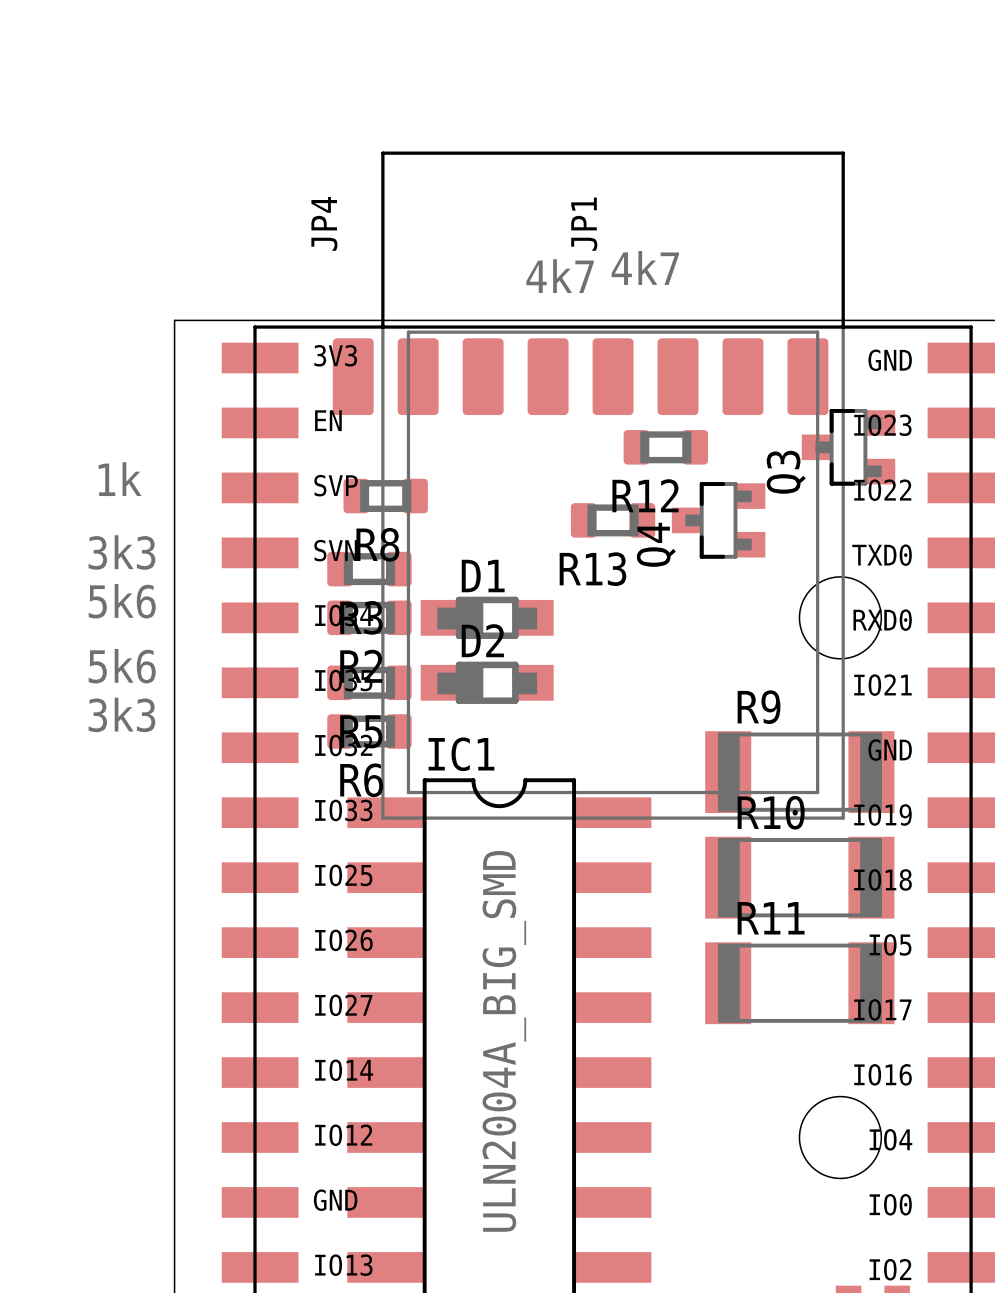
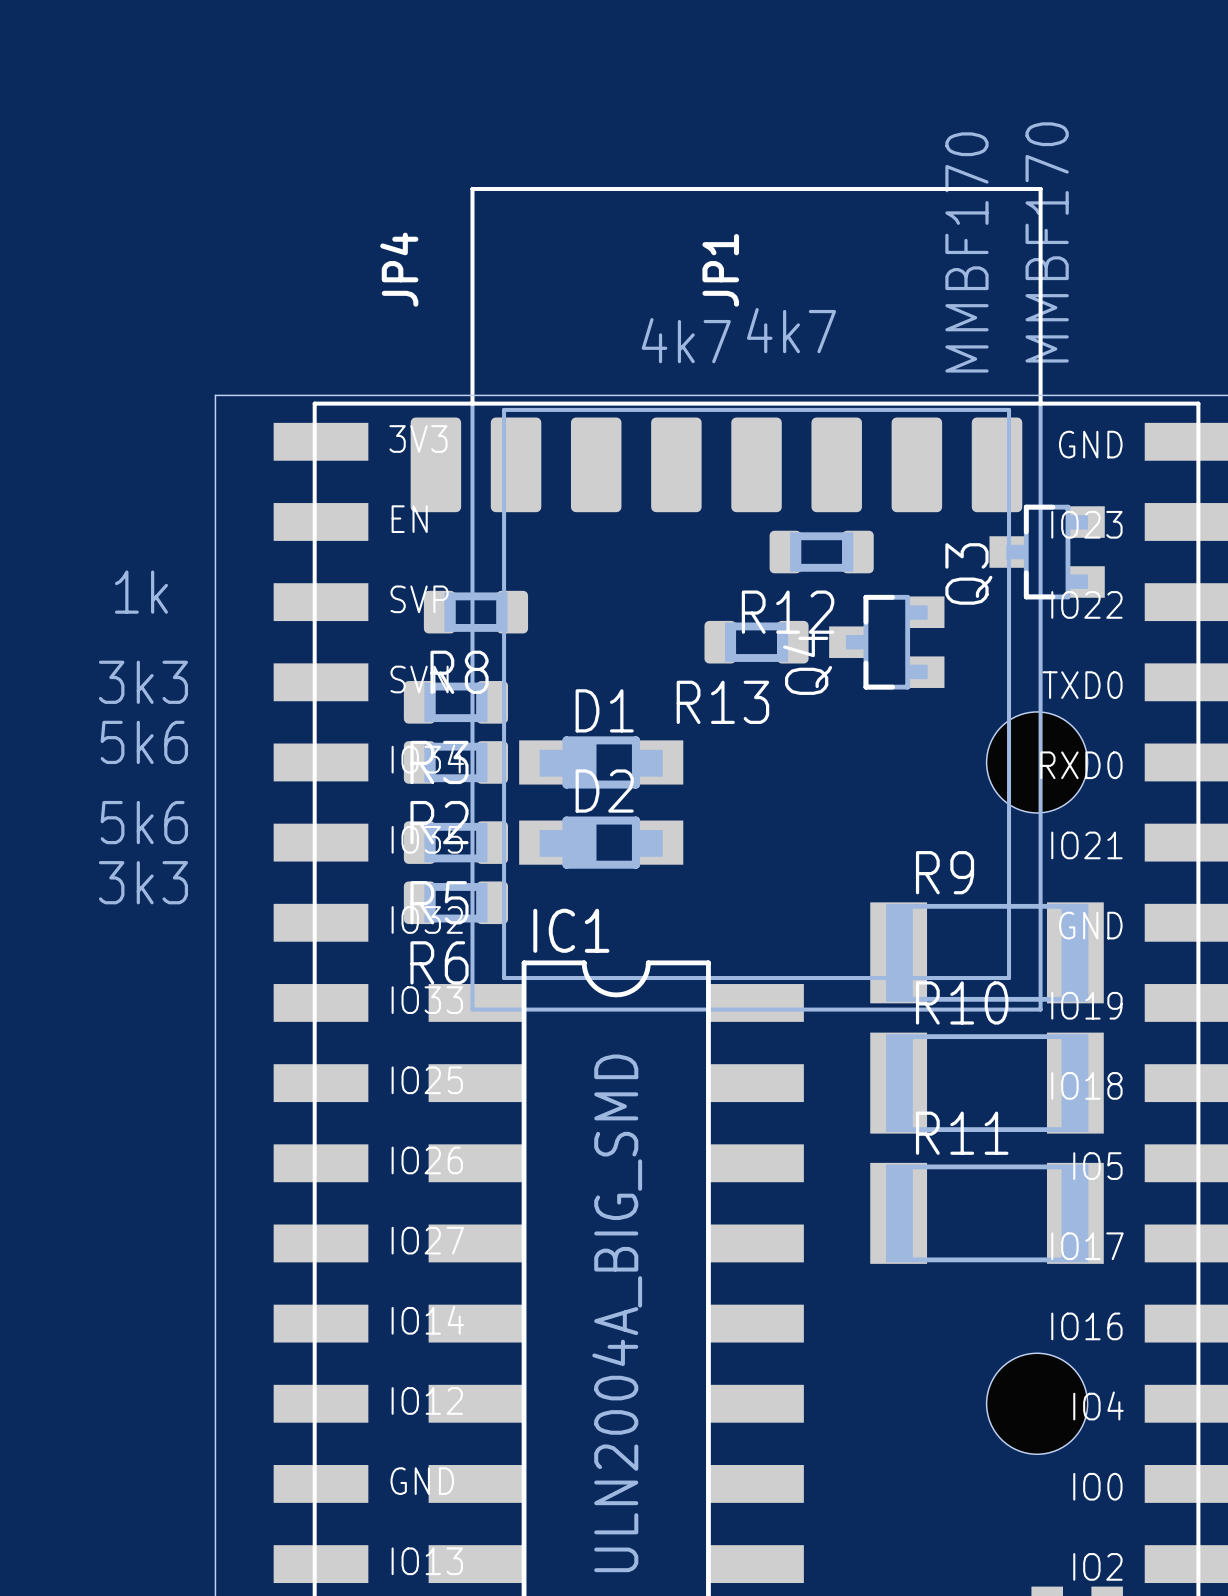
Q3 value: none -> MMBF170 (1047, 242)
Q4 value: none -> MMBF170 (966, 252)

